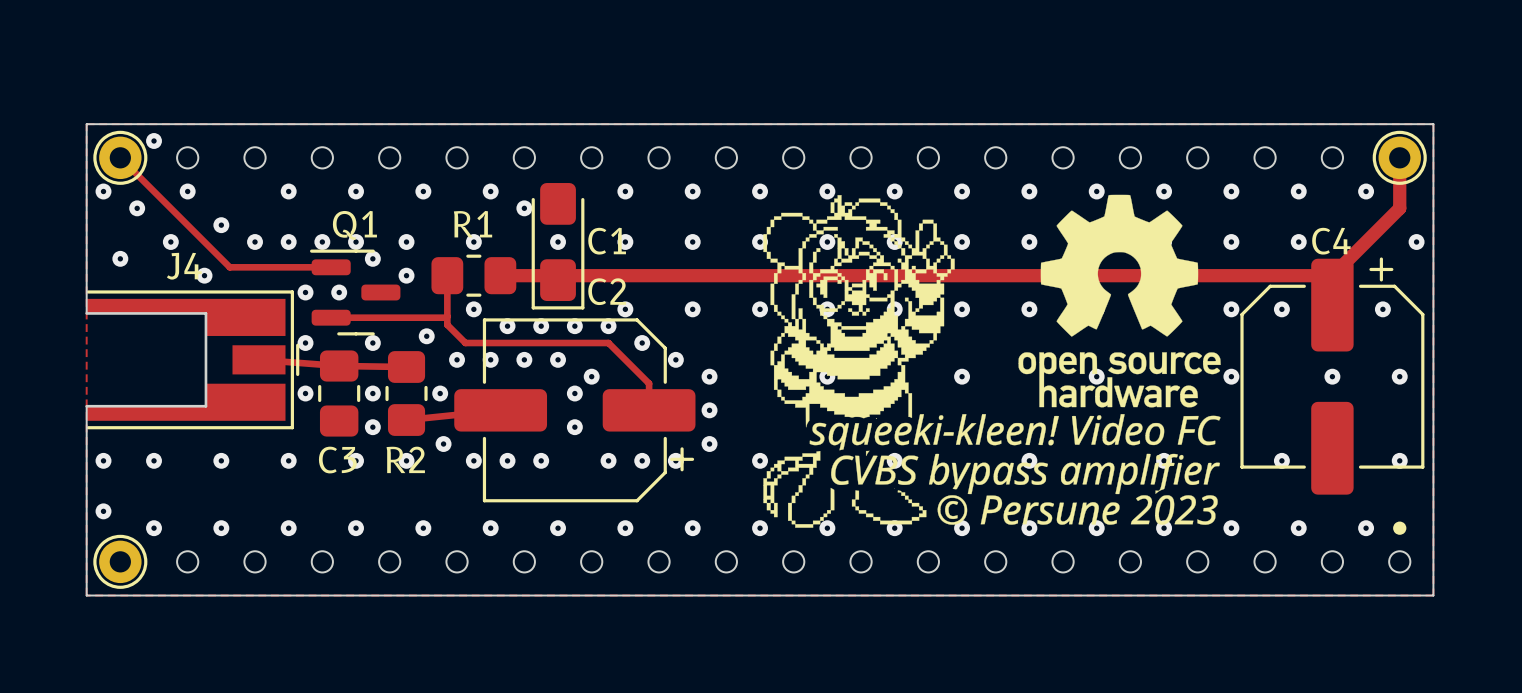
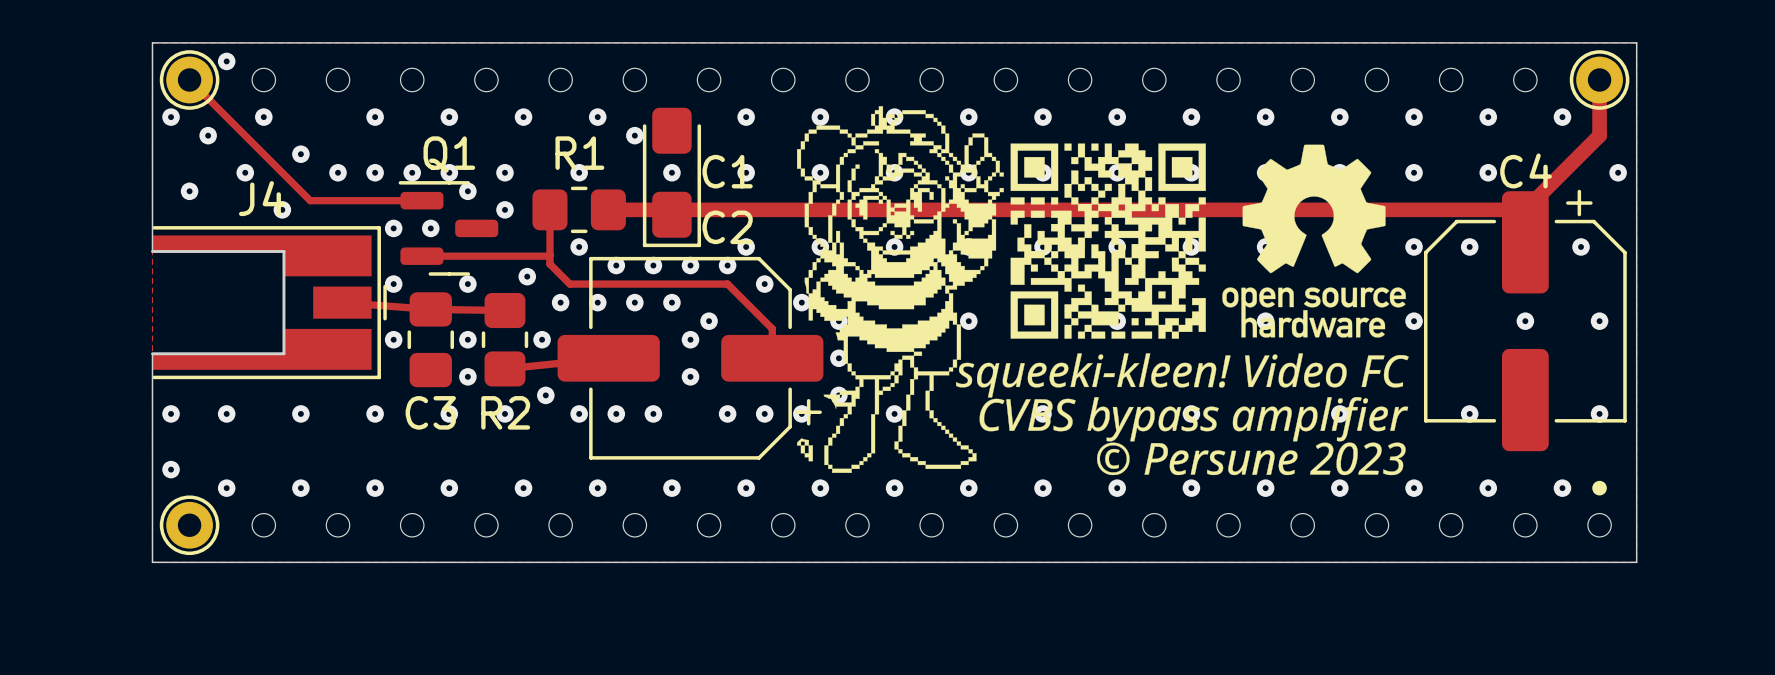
drawing: none -> [796, 106, 1409, 476]
drawing: [763, 194, 1221, 528] -> none

